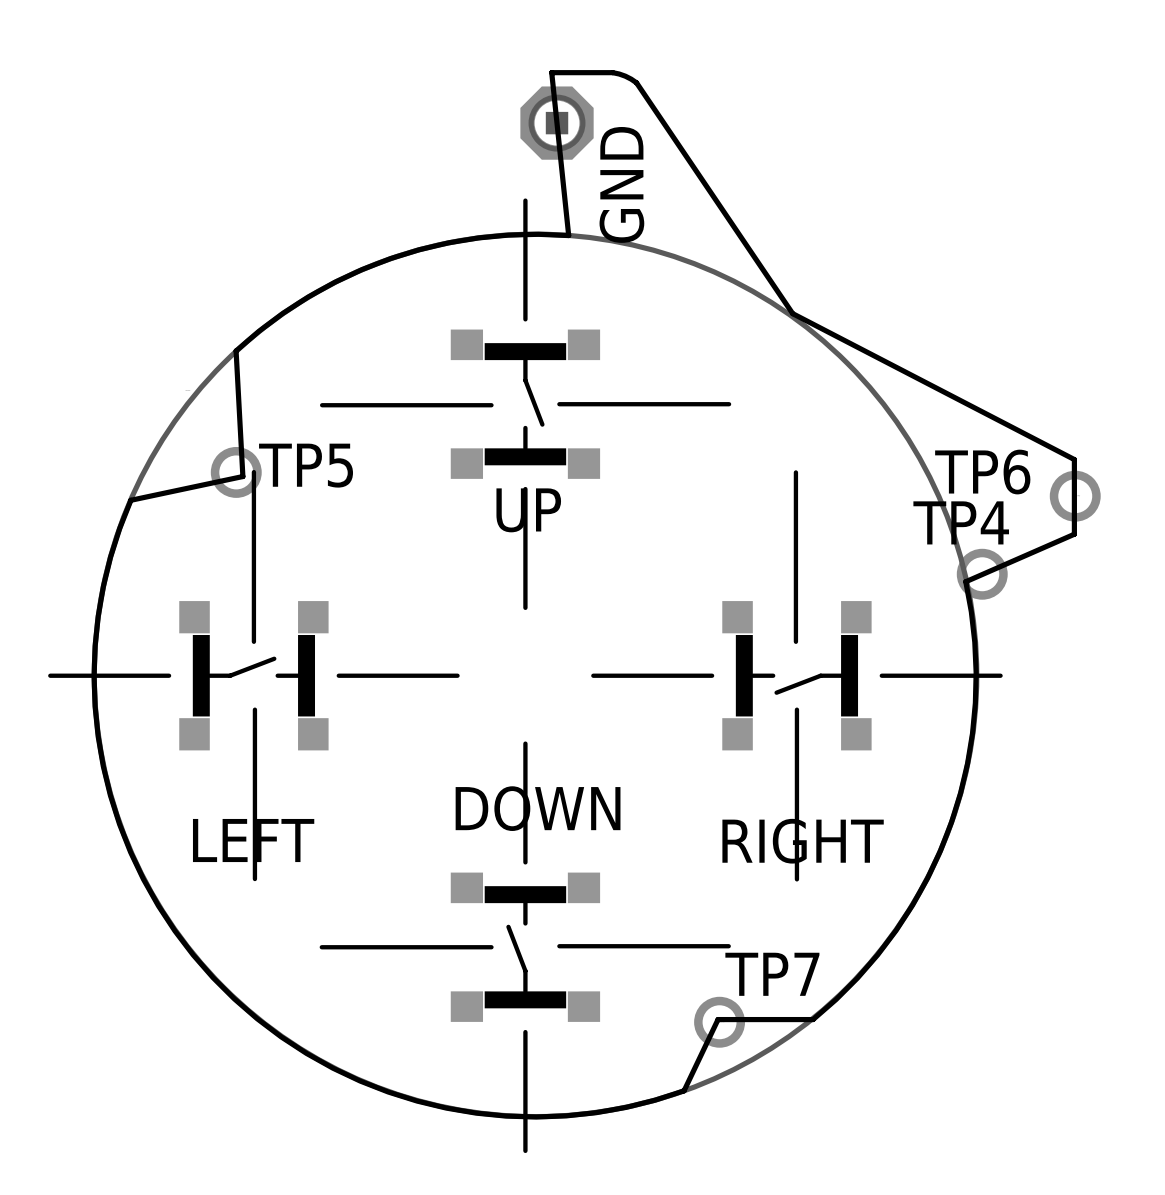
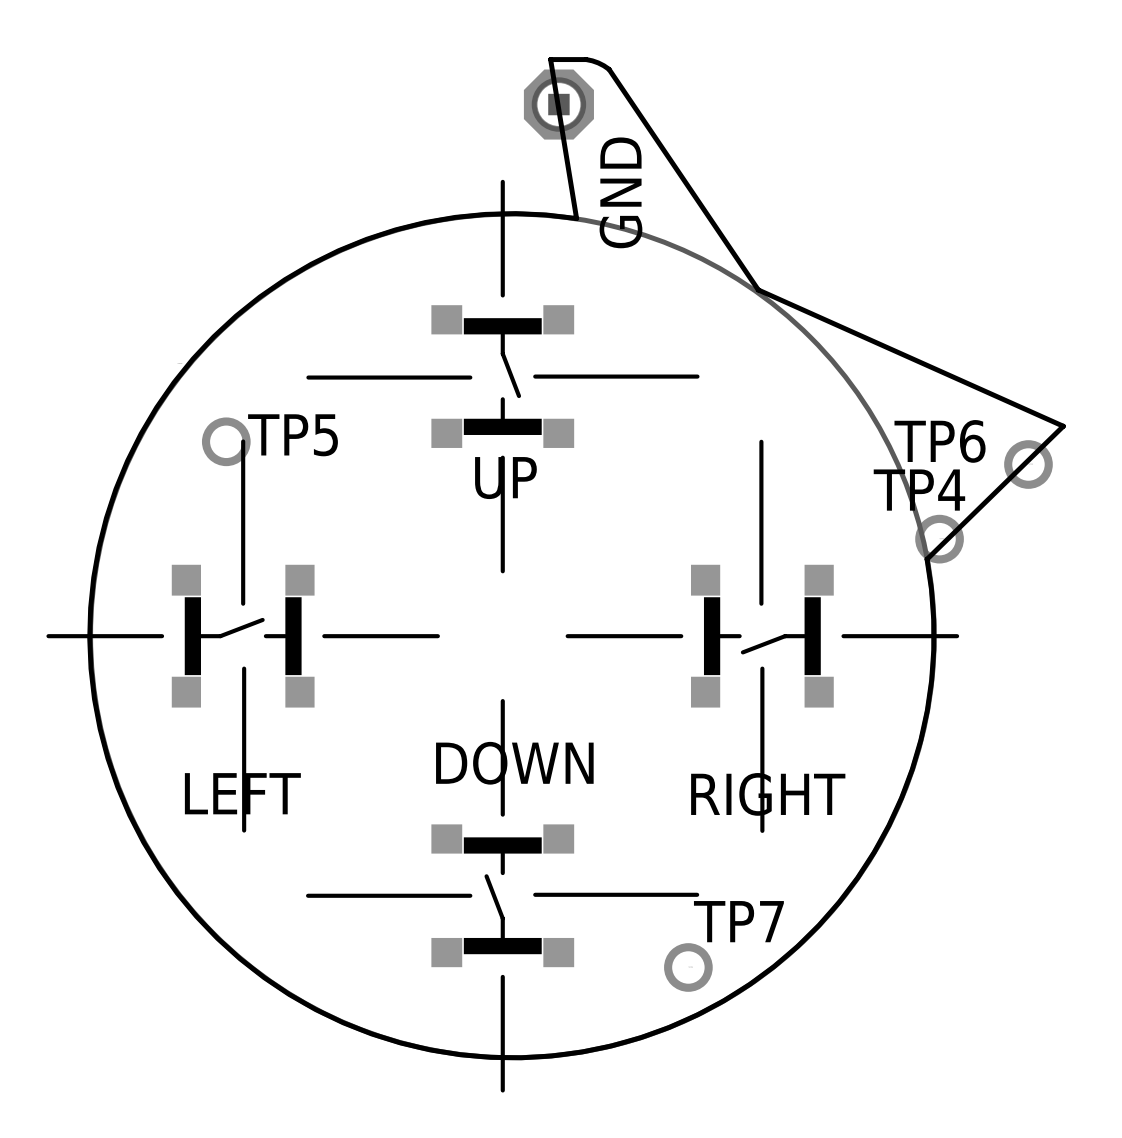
board edge: (575, 72) (551, 72) (568, 235) (508, 235) (478, 237) (419, 249) (362, 269) (308, 296) (283, 313) (236, 350) (242, 476) (130, 500) (110, 557) (98, 616) (95, 646) (95, 706) (103, 766) (119, 824) (143, 879) (174, 930) (213, 977) (257, 1018) (281, 1036) (332, 1068) (360, 1081) (417, 1101) (446, 1108) (476, 1113) (536, 1117) (596, 1112) (655, 1100) (684, 1090) (718, 1019) (813, 1019) (857, 977) (896, 930) (927, 878) (940, 850) (951, 822) (967, 763) (972, 733) (976, 672) (974, 642) (965, 581) (1074, 534) (1074, 459) (792, 313) -> (550, 59) (576, 218) (515, 213) (485, 214) (425, 222) (366, 239) (311, 264) (285, 279) (236, 316) (213, 336) (174, 382) (156, 407) (127, 461) (106, 518) (93, 577) (89, 638) (94, 698) (107, 758) (129, 815) (159, 868) (177, 892) (217, 938) (264, 977) (289, 994) (343, 1022) (400, 1042) (460, 1054) (490, 1057) (551, 1056) (581, 1052) (611, 1045) (669, 1027) (697, 1014) (749, 984) (797, 946) (819, 925) (857, 878) (874, 852) (901, 798) (912, 769) (927, 710) (933, 650) (931, 589) (927, 559) (1063, 426) (758, 289)
GND position: (557, 123) -> (558, 104)
GND name position: GND (621, 184) -> GND (620, 192)

